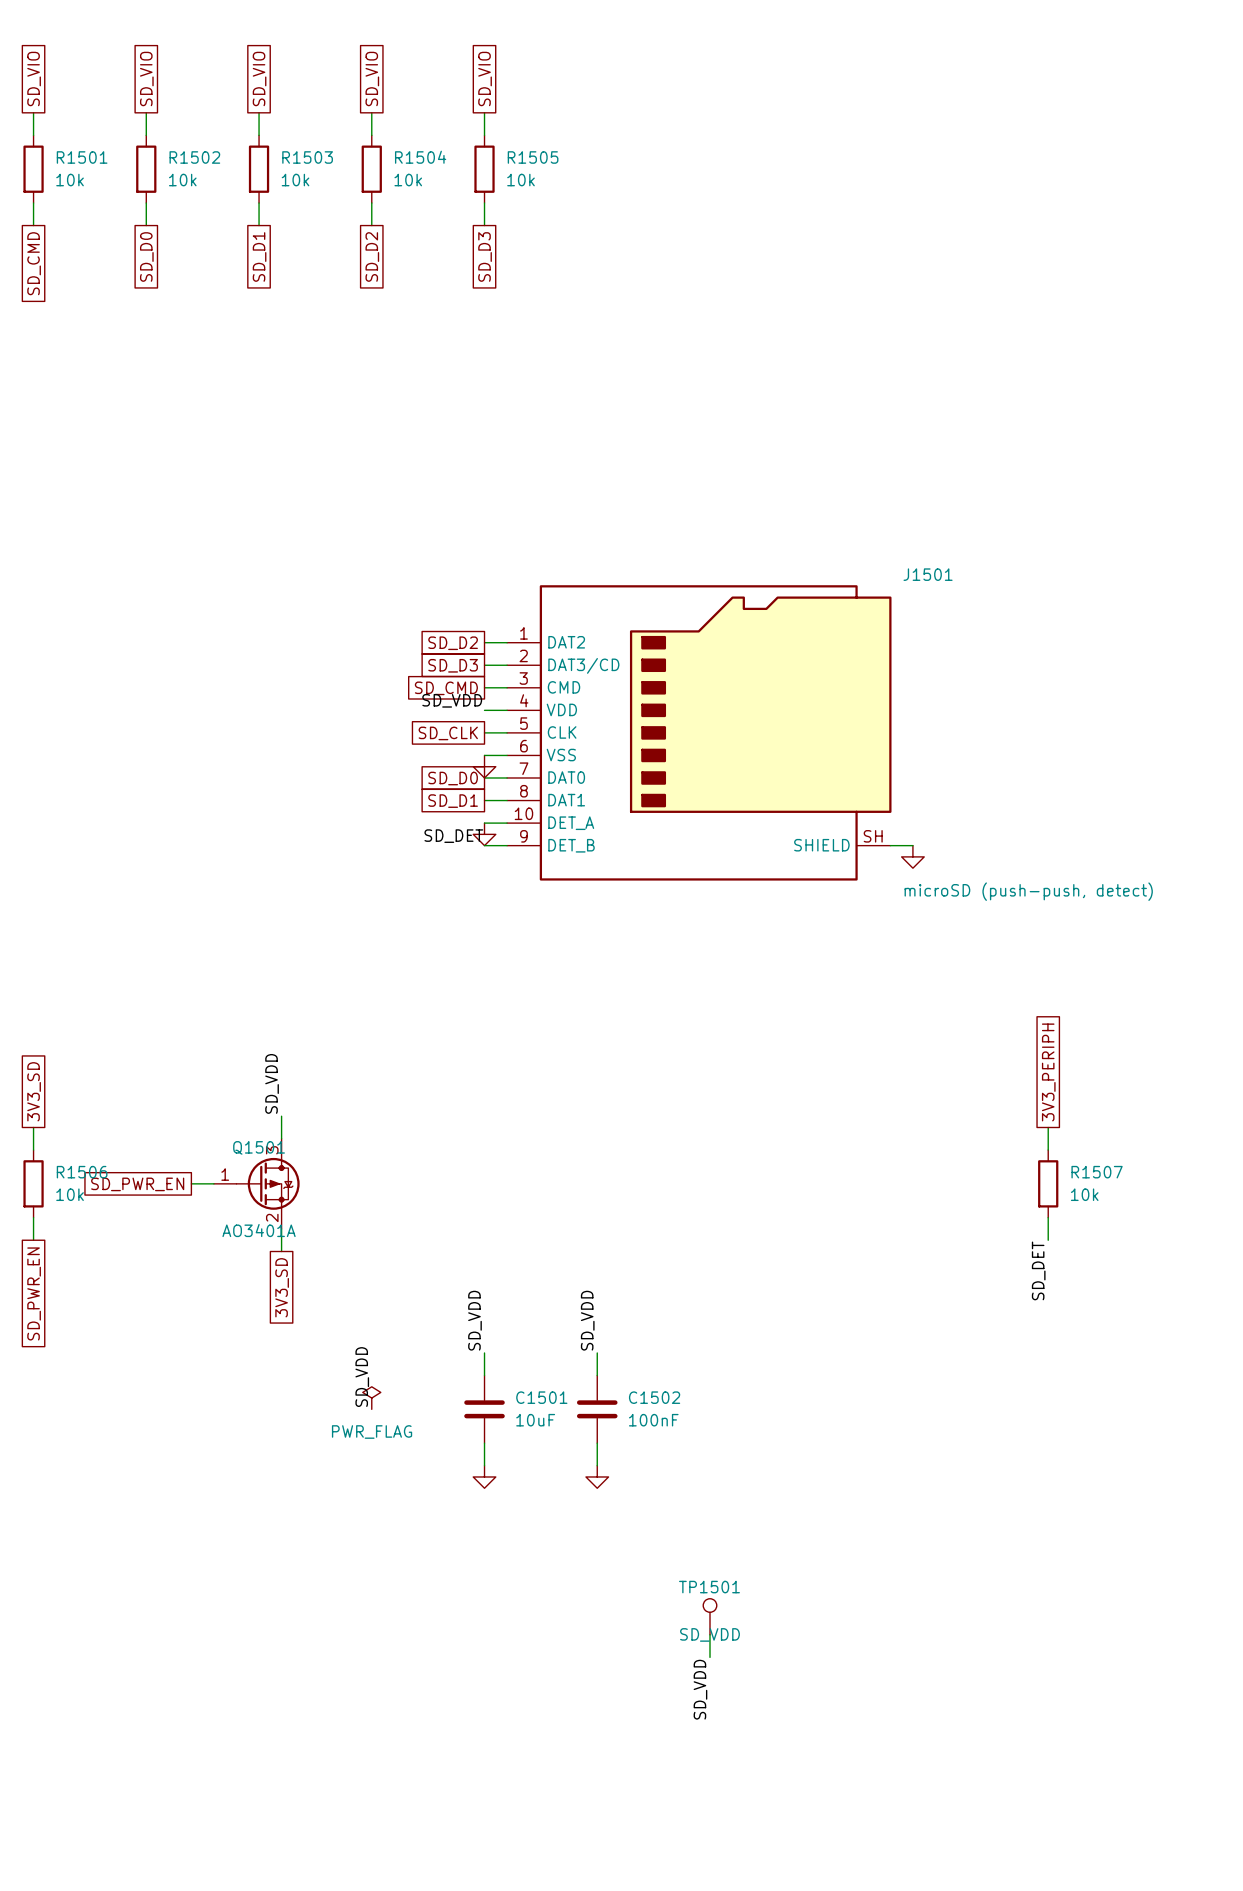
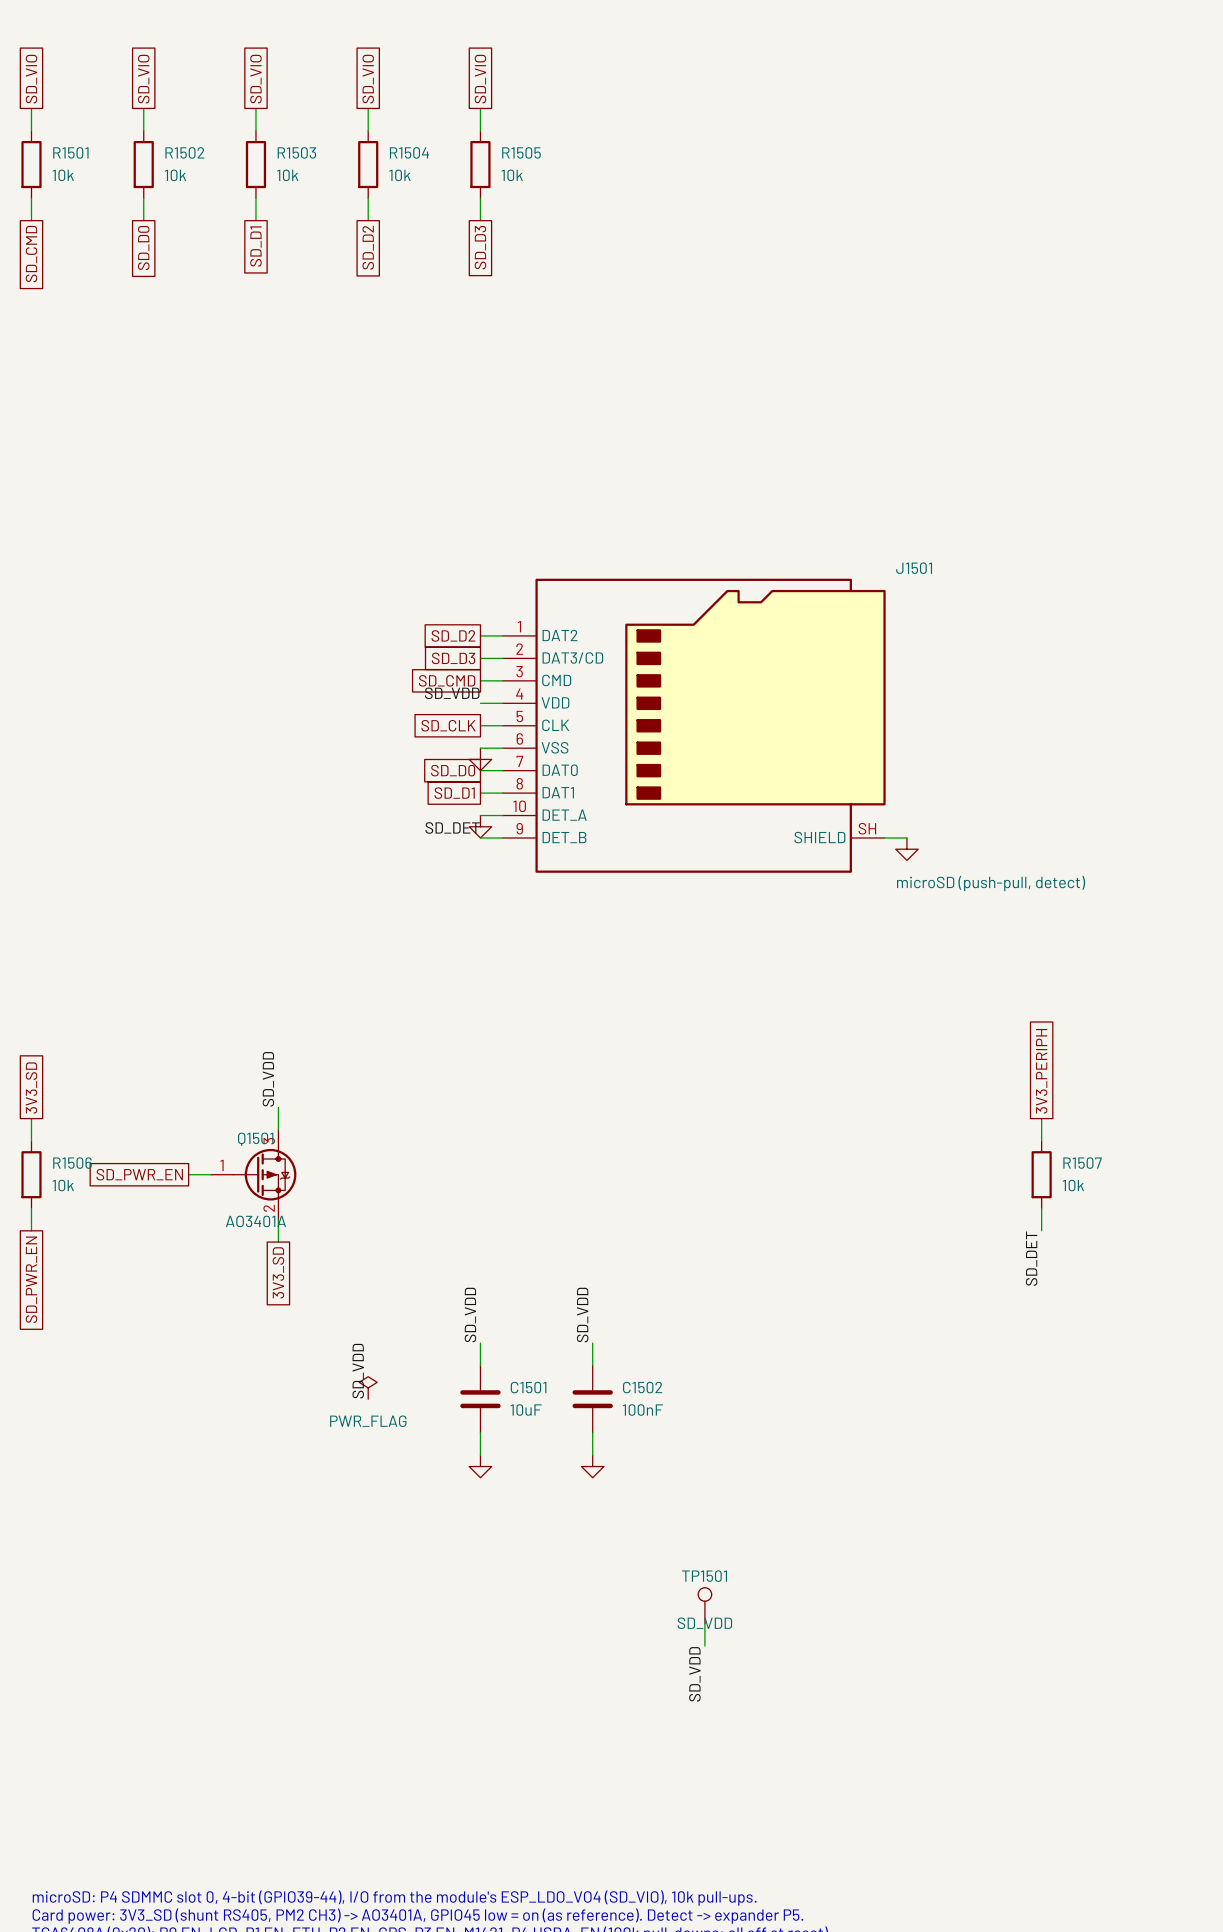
J1501 value: microSD (push-push, detect) (1028, 891) -> microSD (push-pull, detect) (991, 883)

